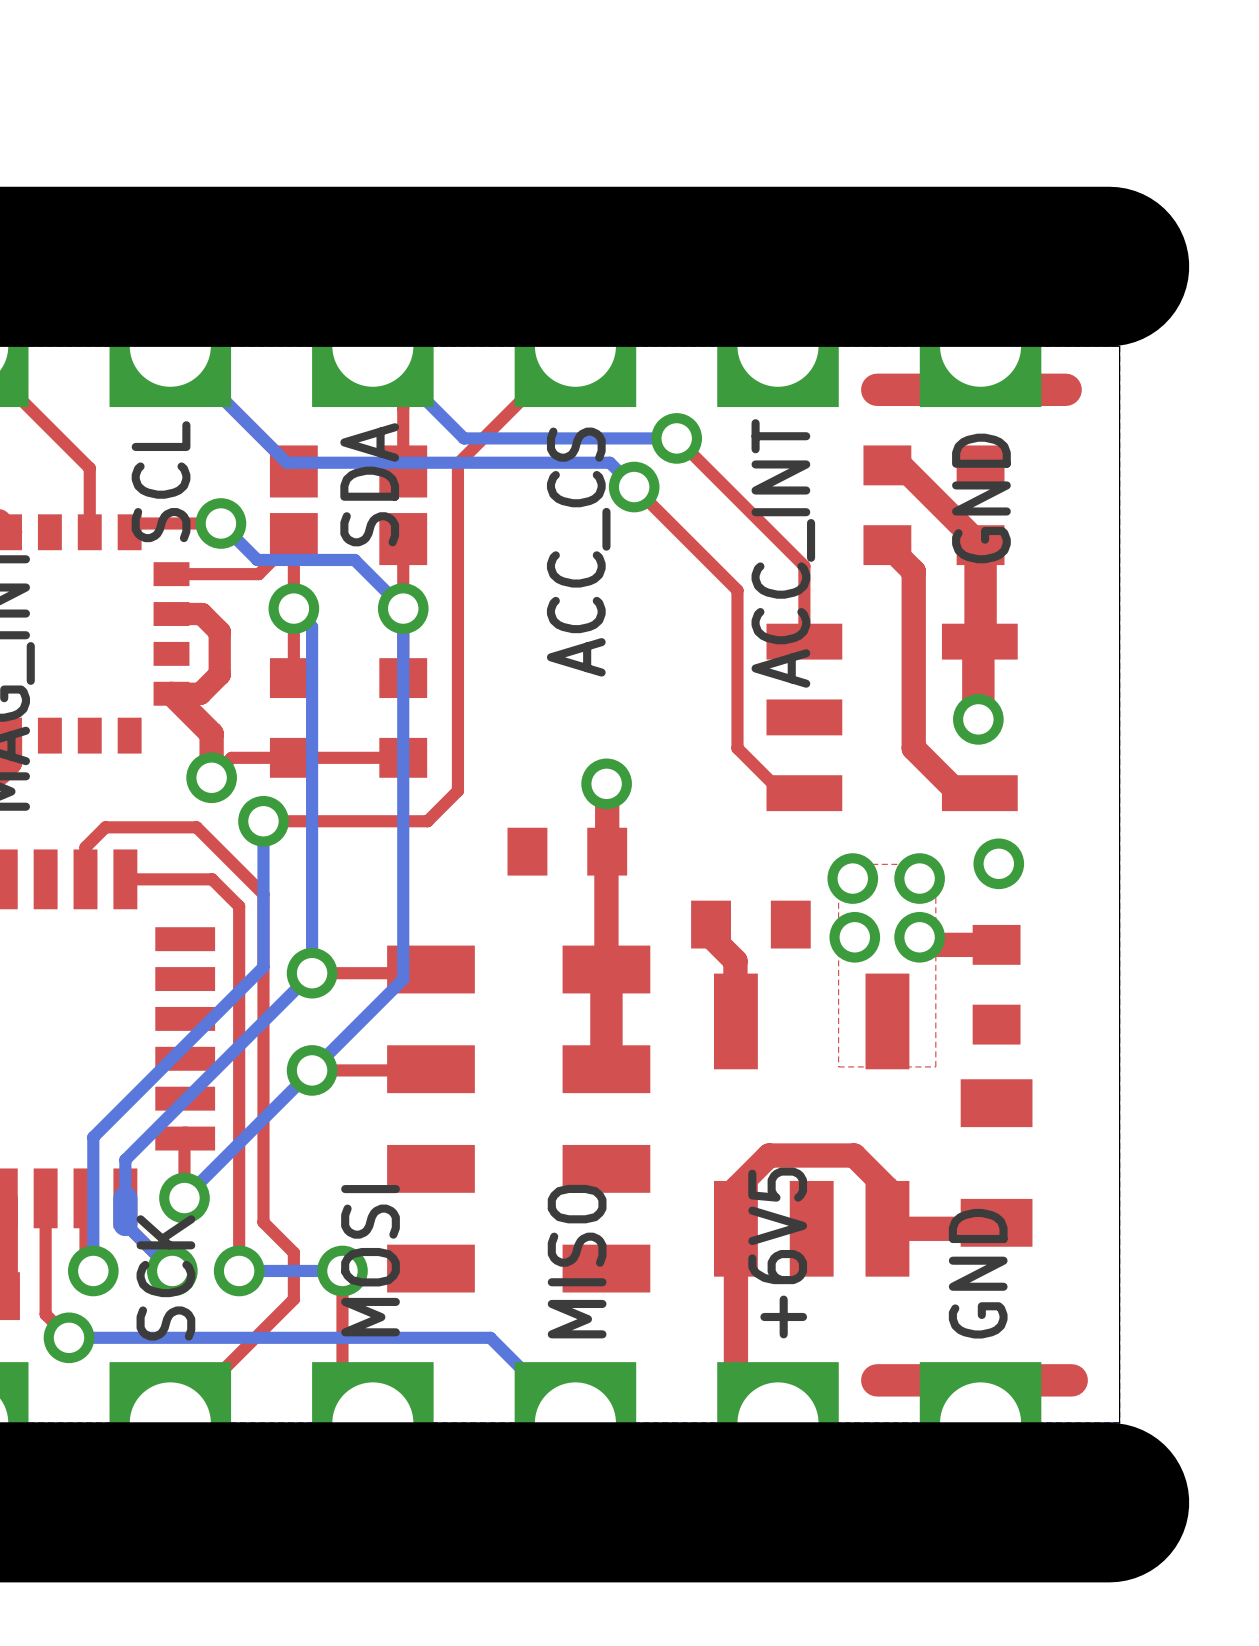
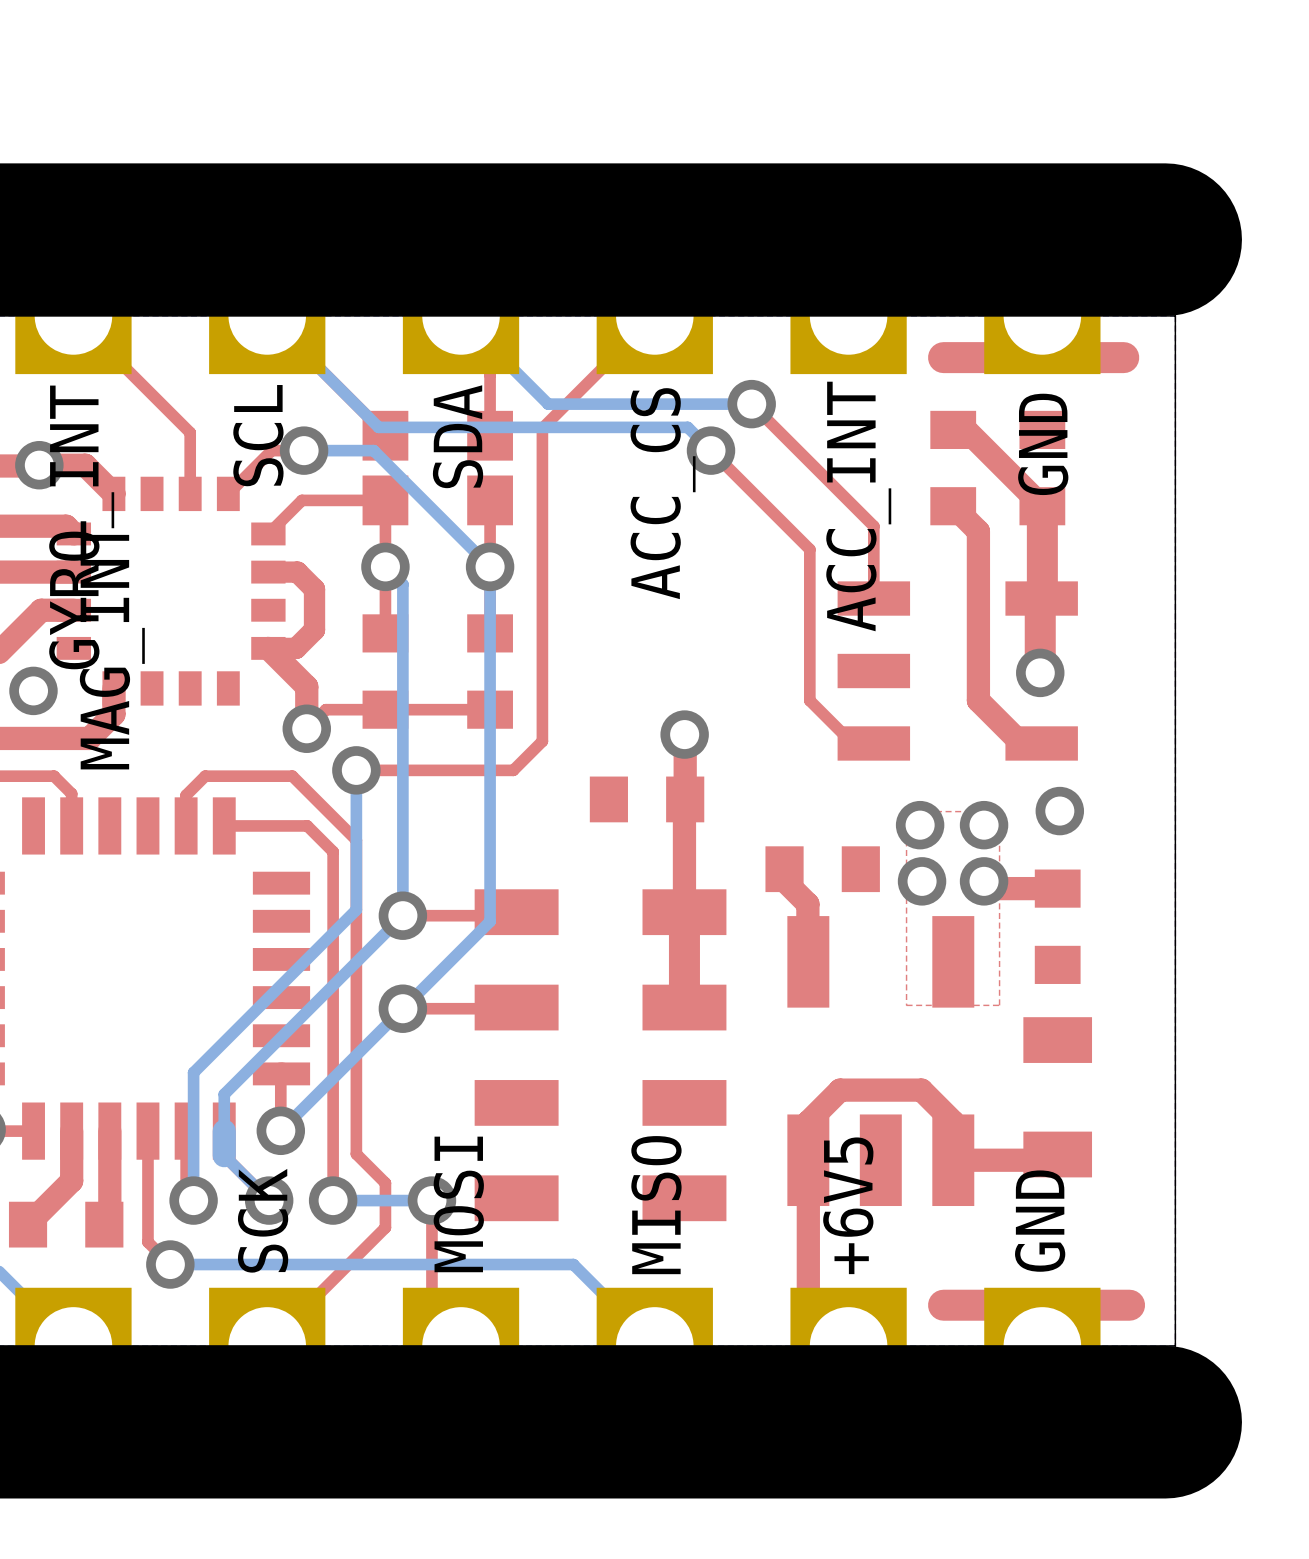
top track: (220, 523) (138, 523) -> (304, 450) (271, 450) (236, 485)
bottom track: (220, 523) (257, 559) (354, 559) -> (304, 450) (373, 450) (443, 520)
via position: (220, 523) -> (304, 450)
top track: (293, 539) (258, 574) (171, 574) -> (385, 500) (301, 500) (268, 533)

